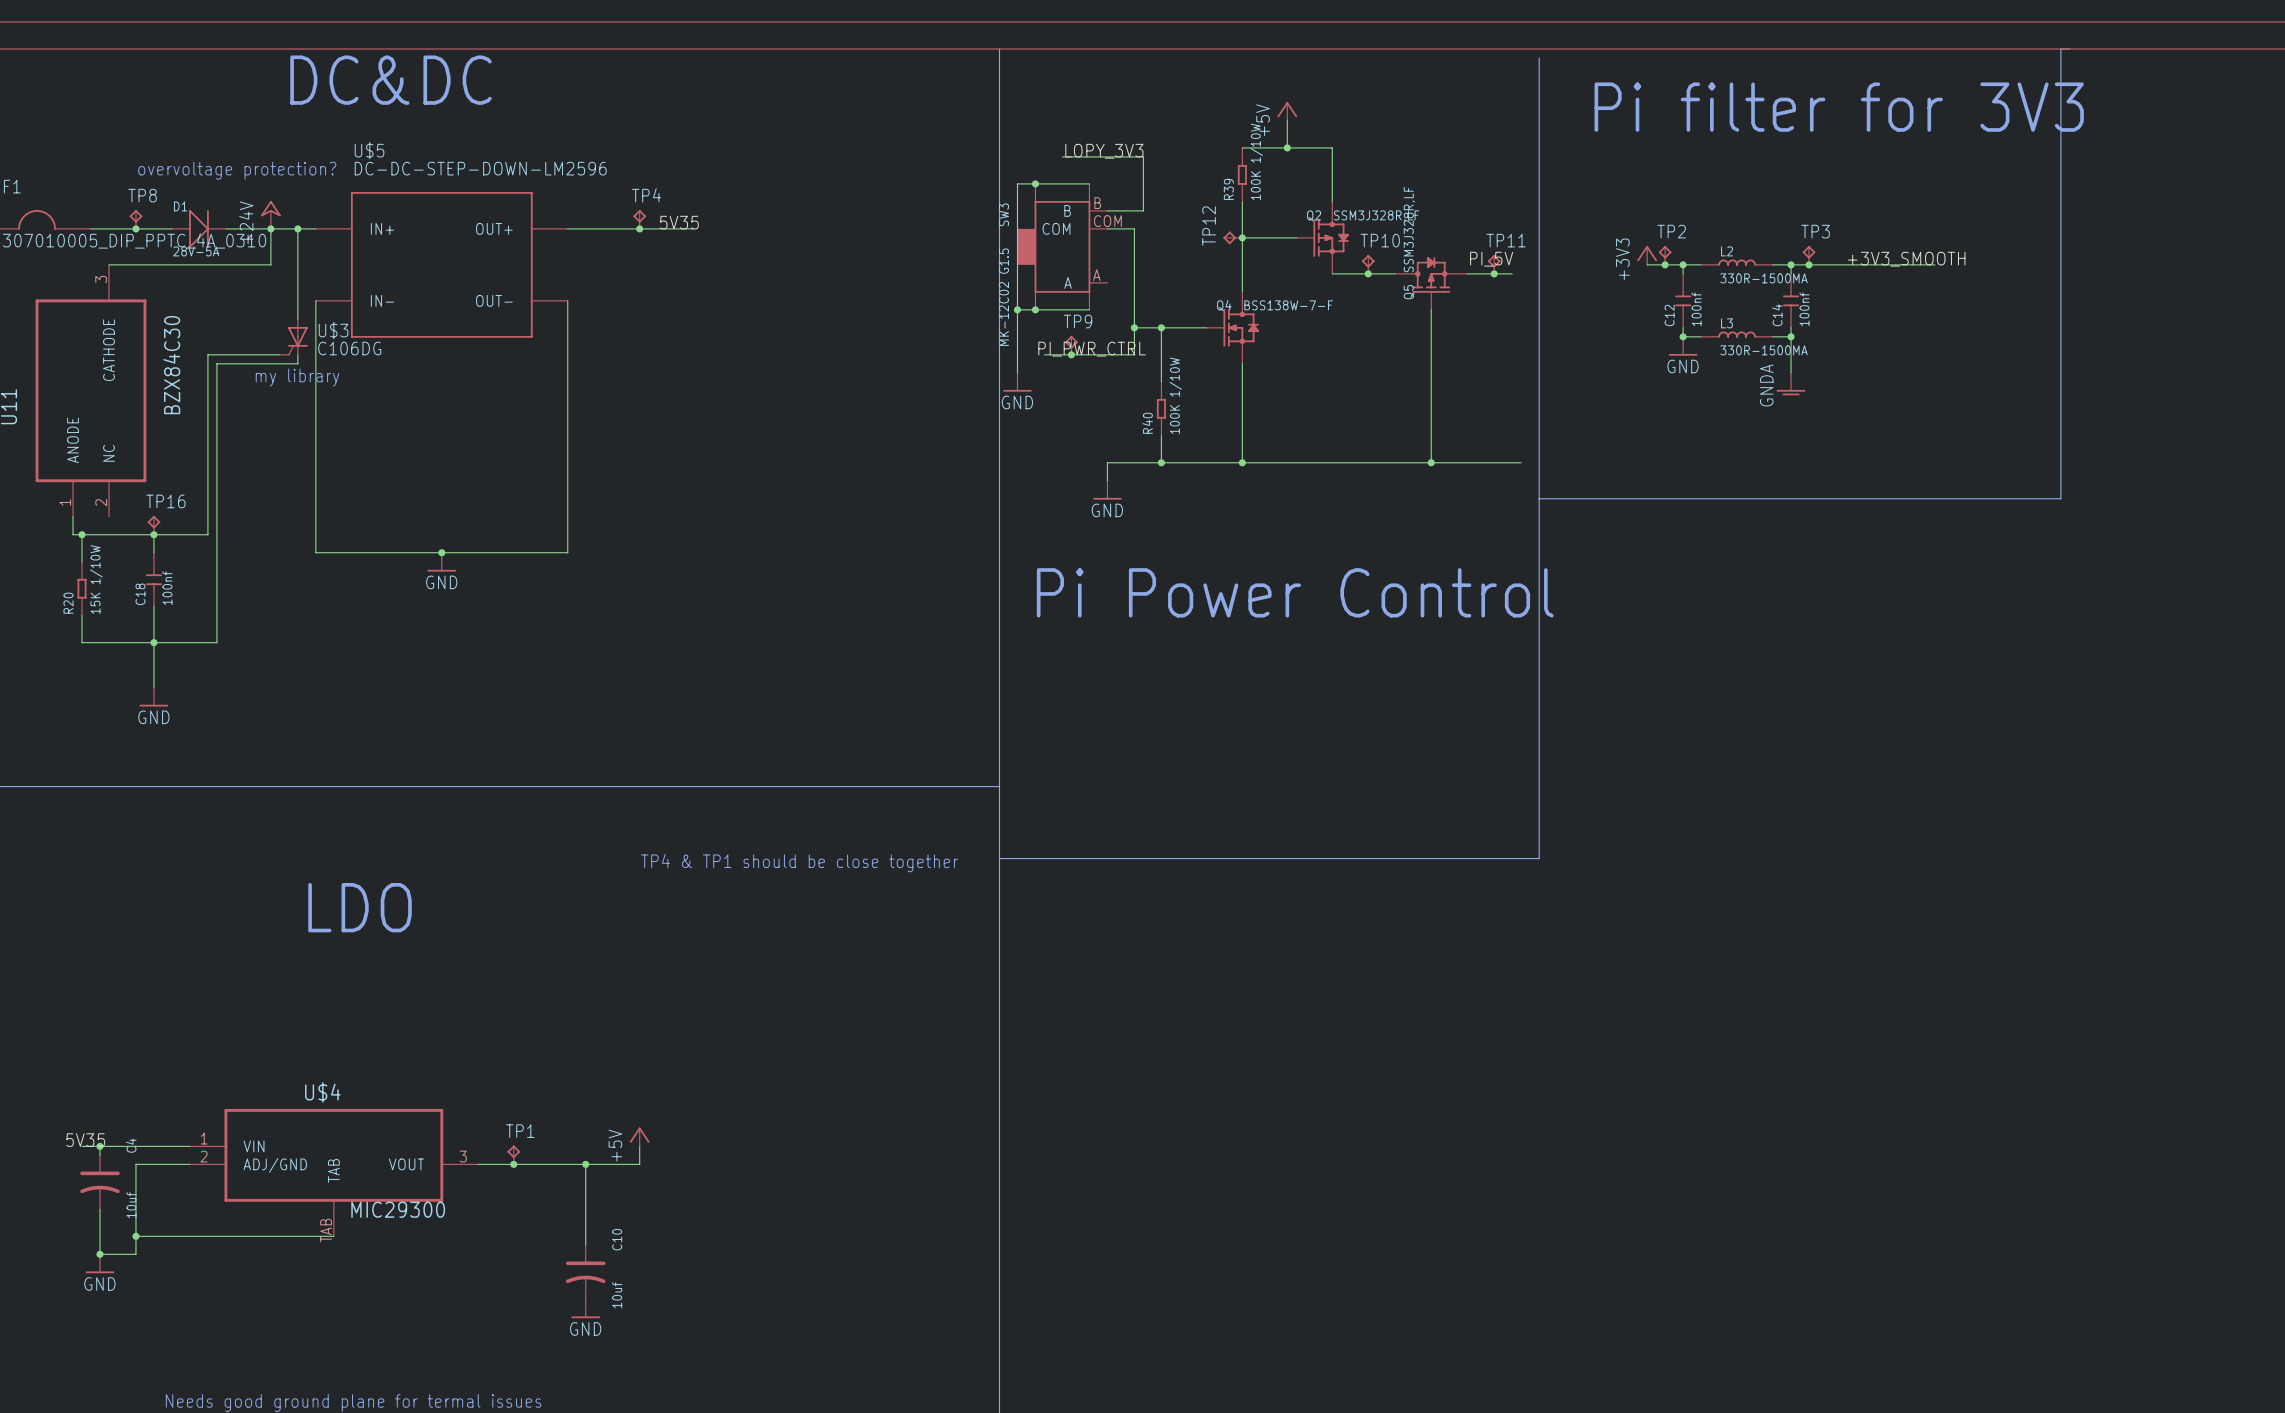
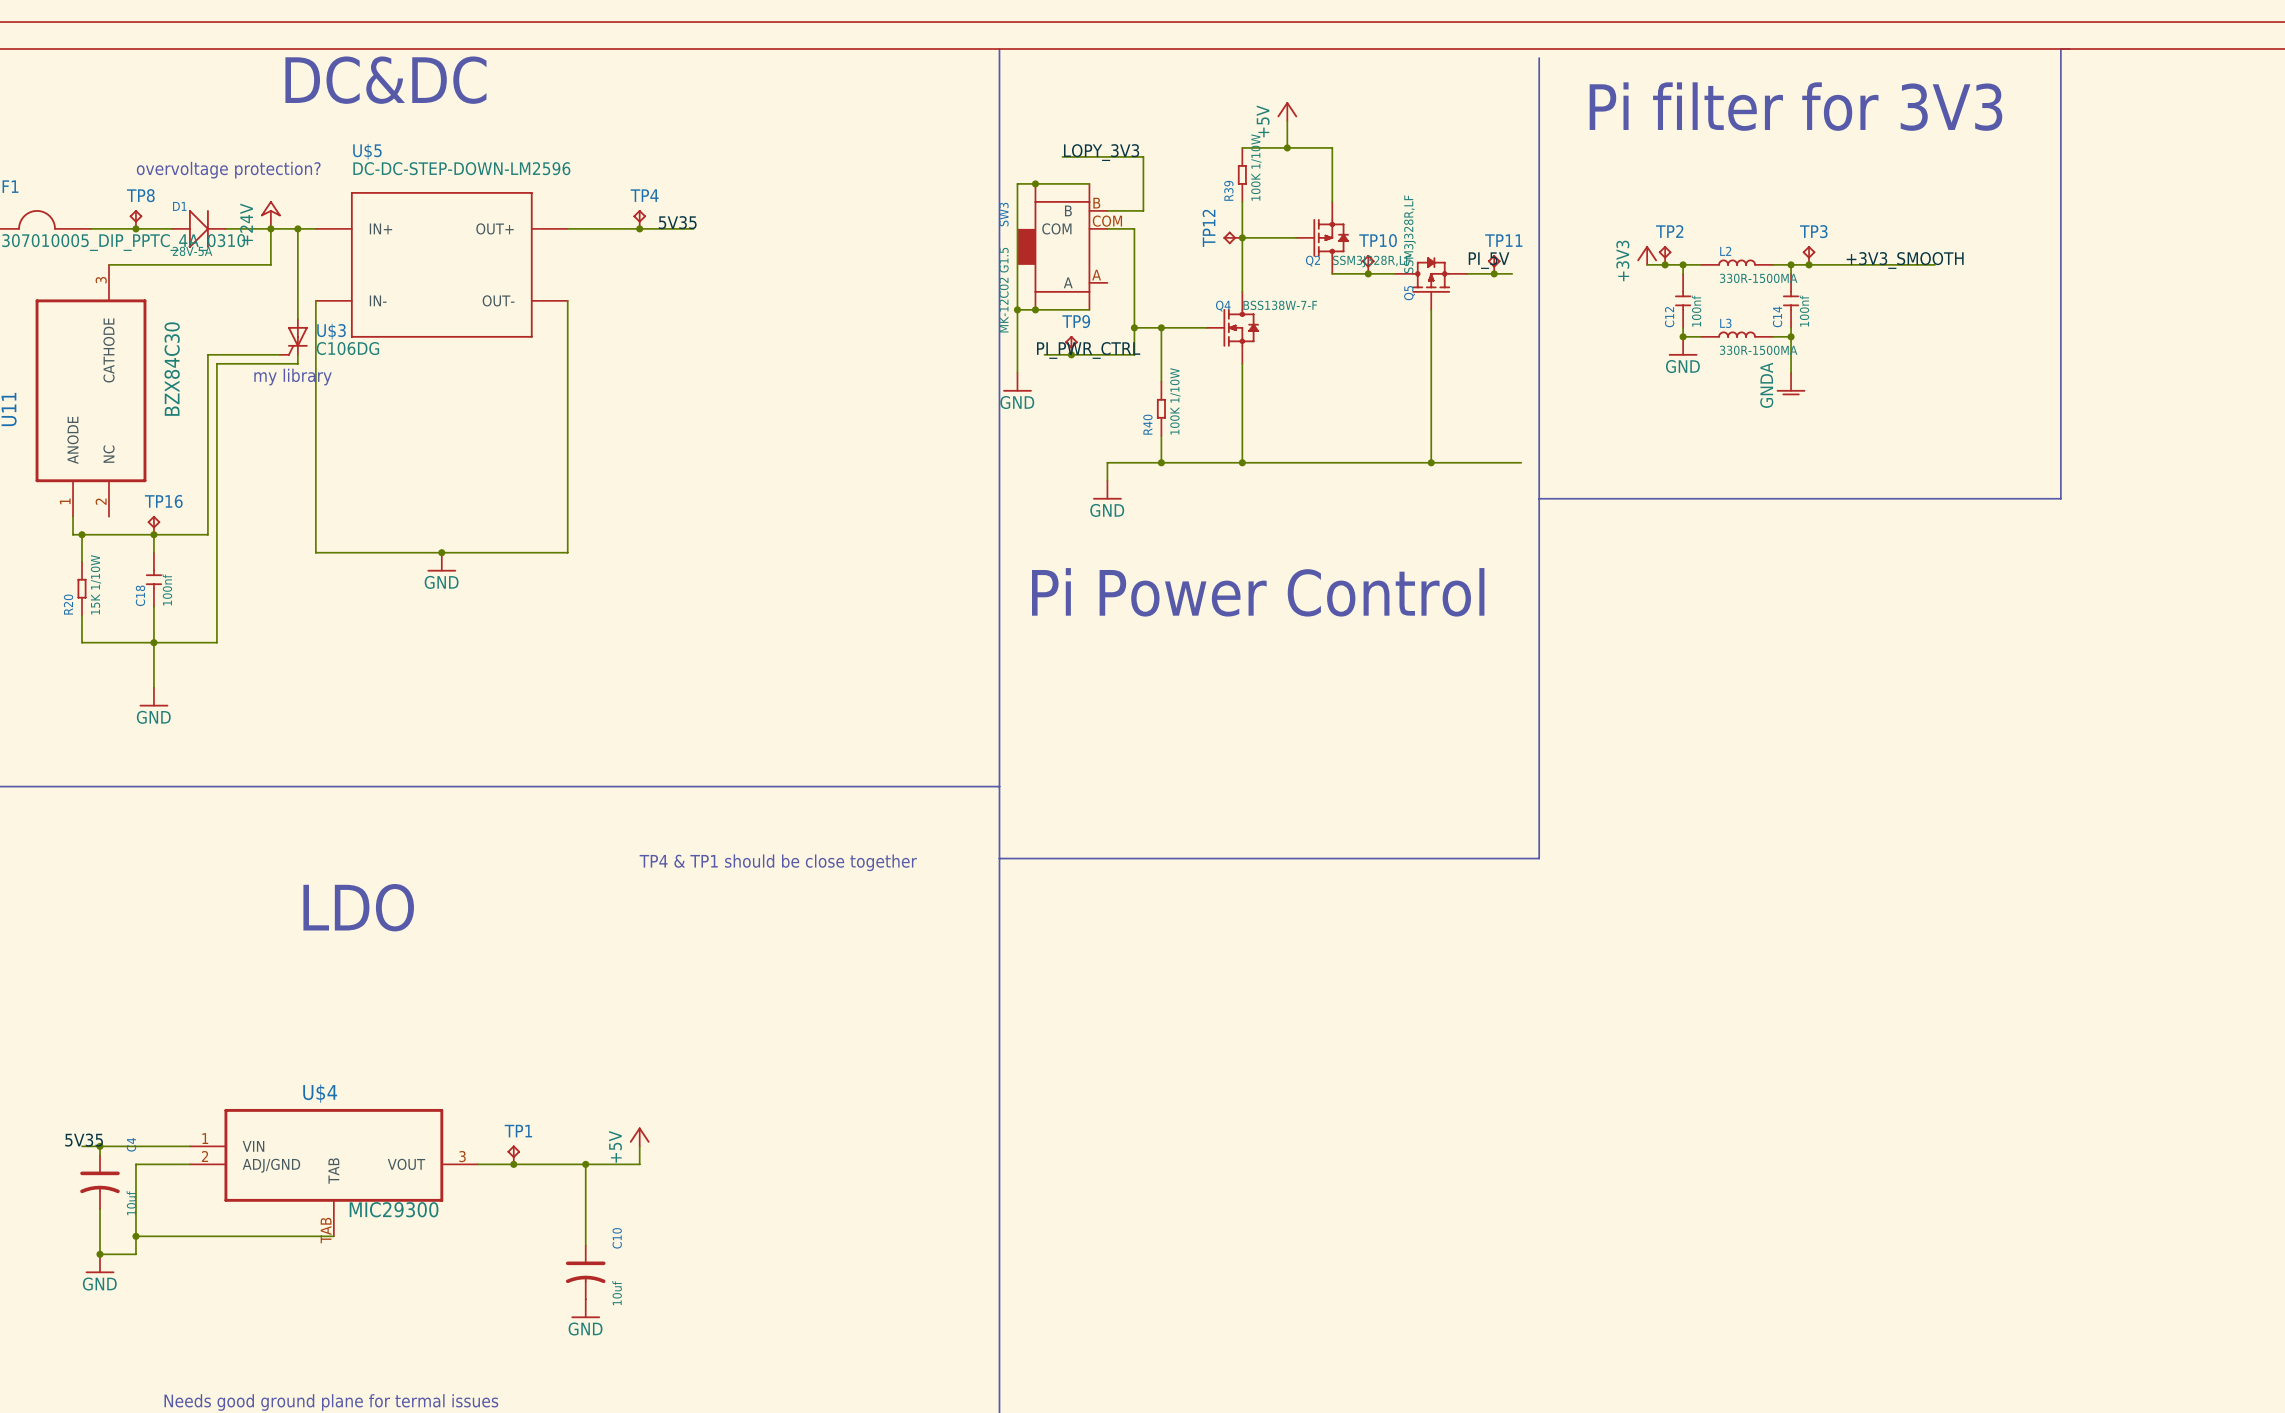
Q2 flip: as is (1331, 237) -> up-down (1331, 237)

